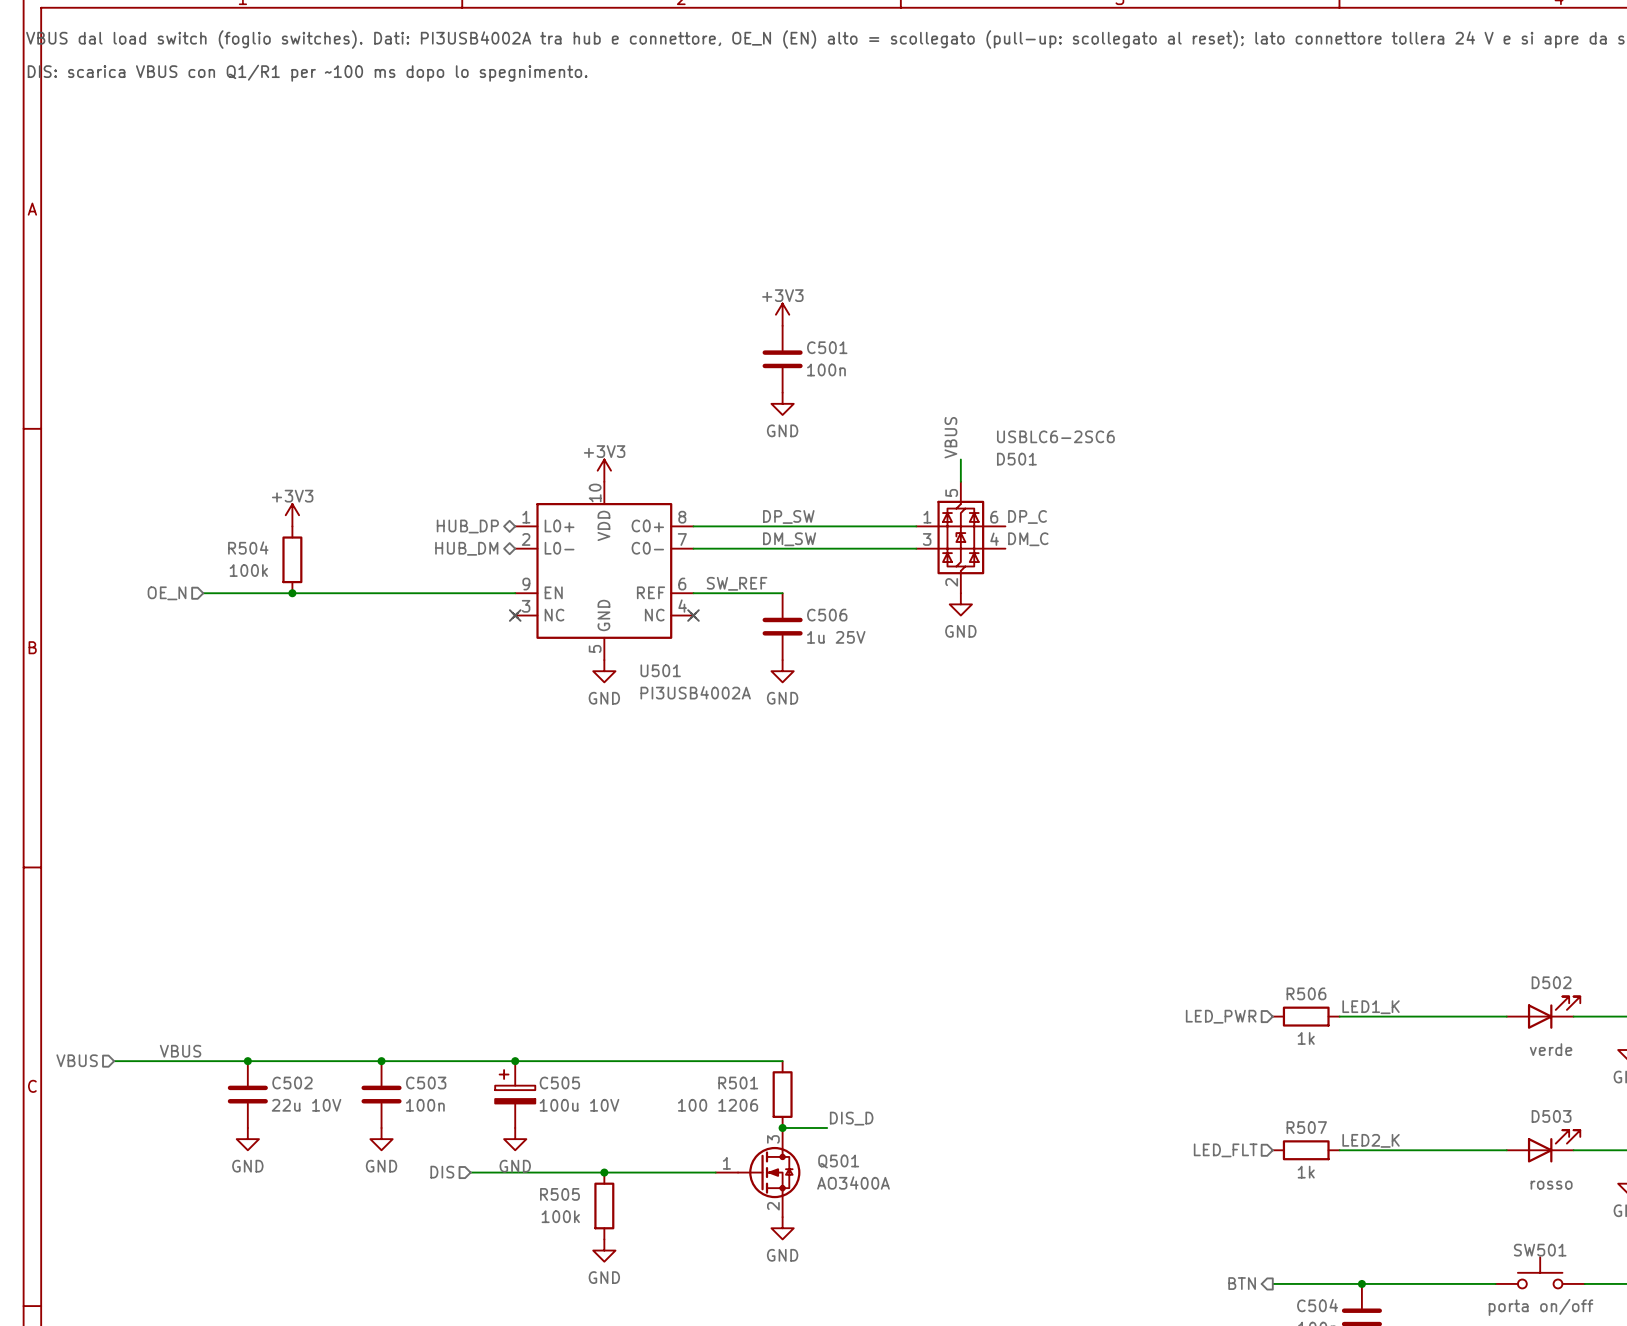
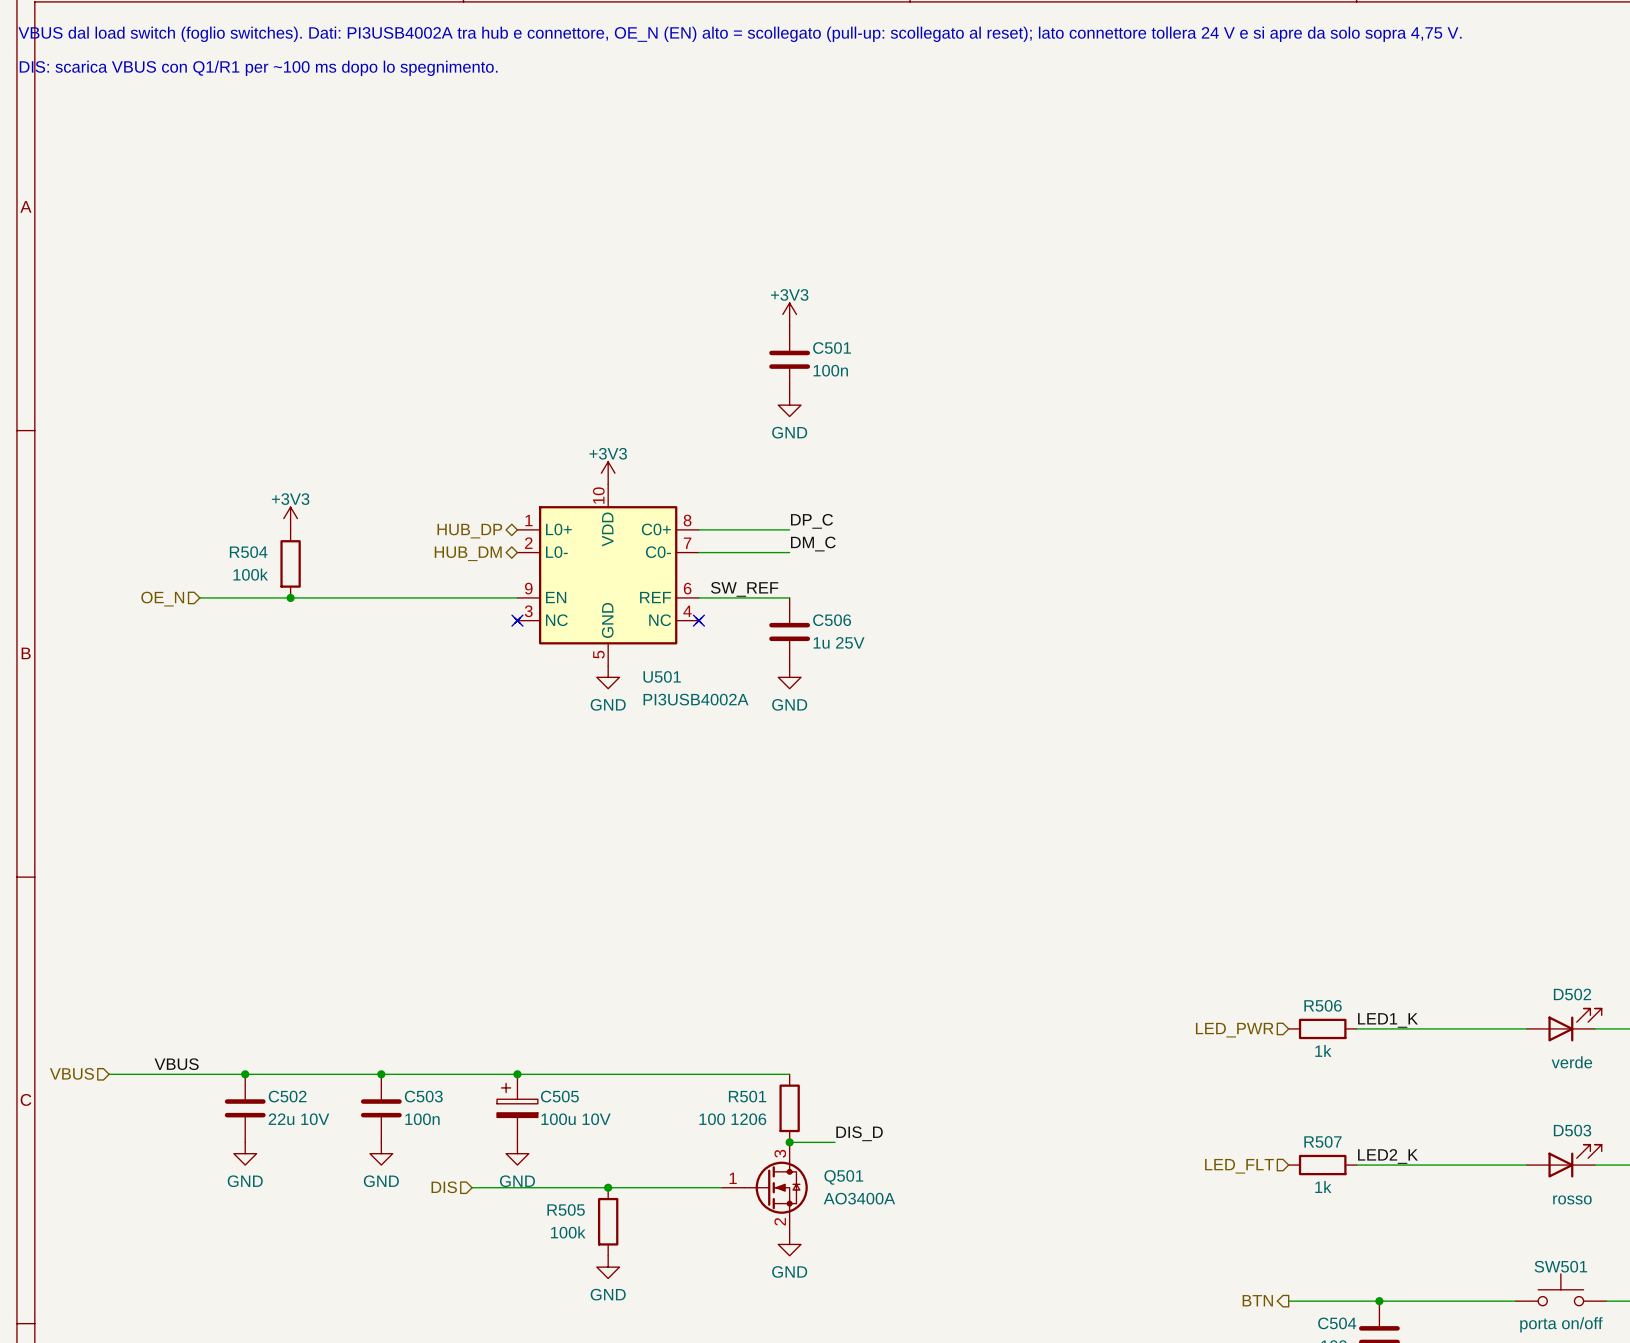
label: VBUS (950, 437) -> none
wire: (960, 459) (960, 481) -> none
label: DP_SW (788, 516) -> DP_C (811, 521)
label: DP_C (1027, 516) -> none
wire: (782, 526) (916, 526) -> none
D501: USBLC6-2SC6 (960, 537) -> none
label: DM_SW (789, 539) -> DM_C (813, 544)
label: DM_C (1028, 539) -> none
wire: (782, 548) (916, 548) -> none
power symbol: GND (960, 604) -> none

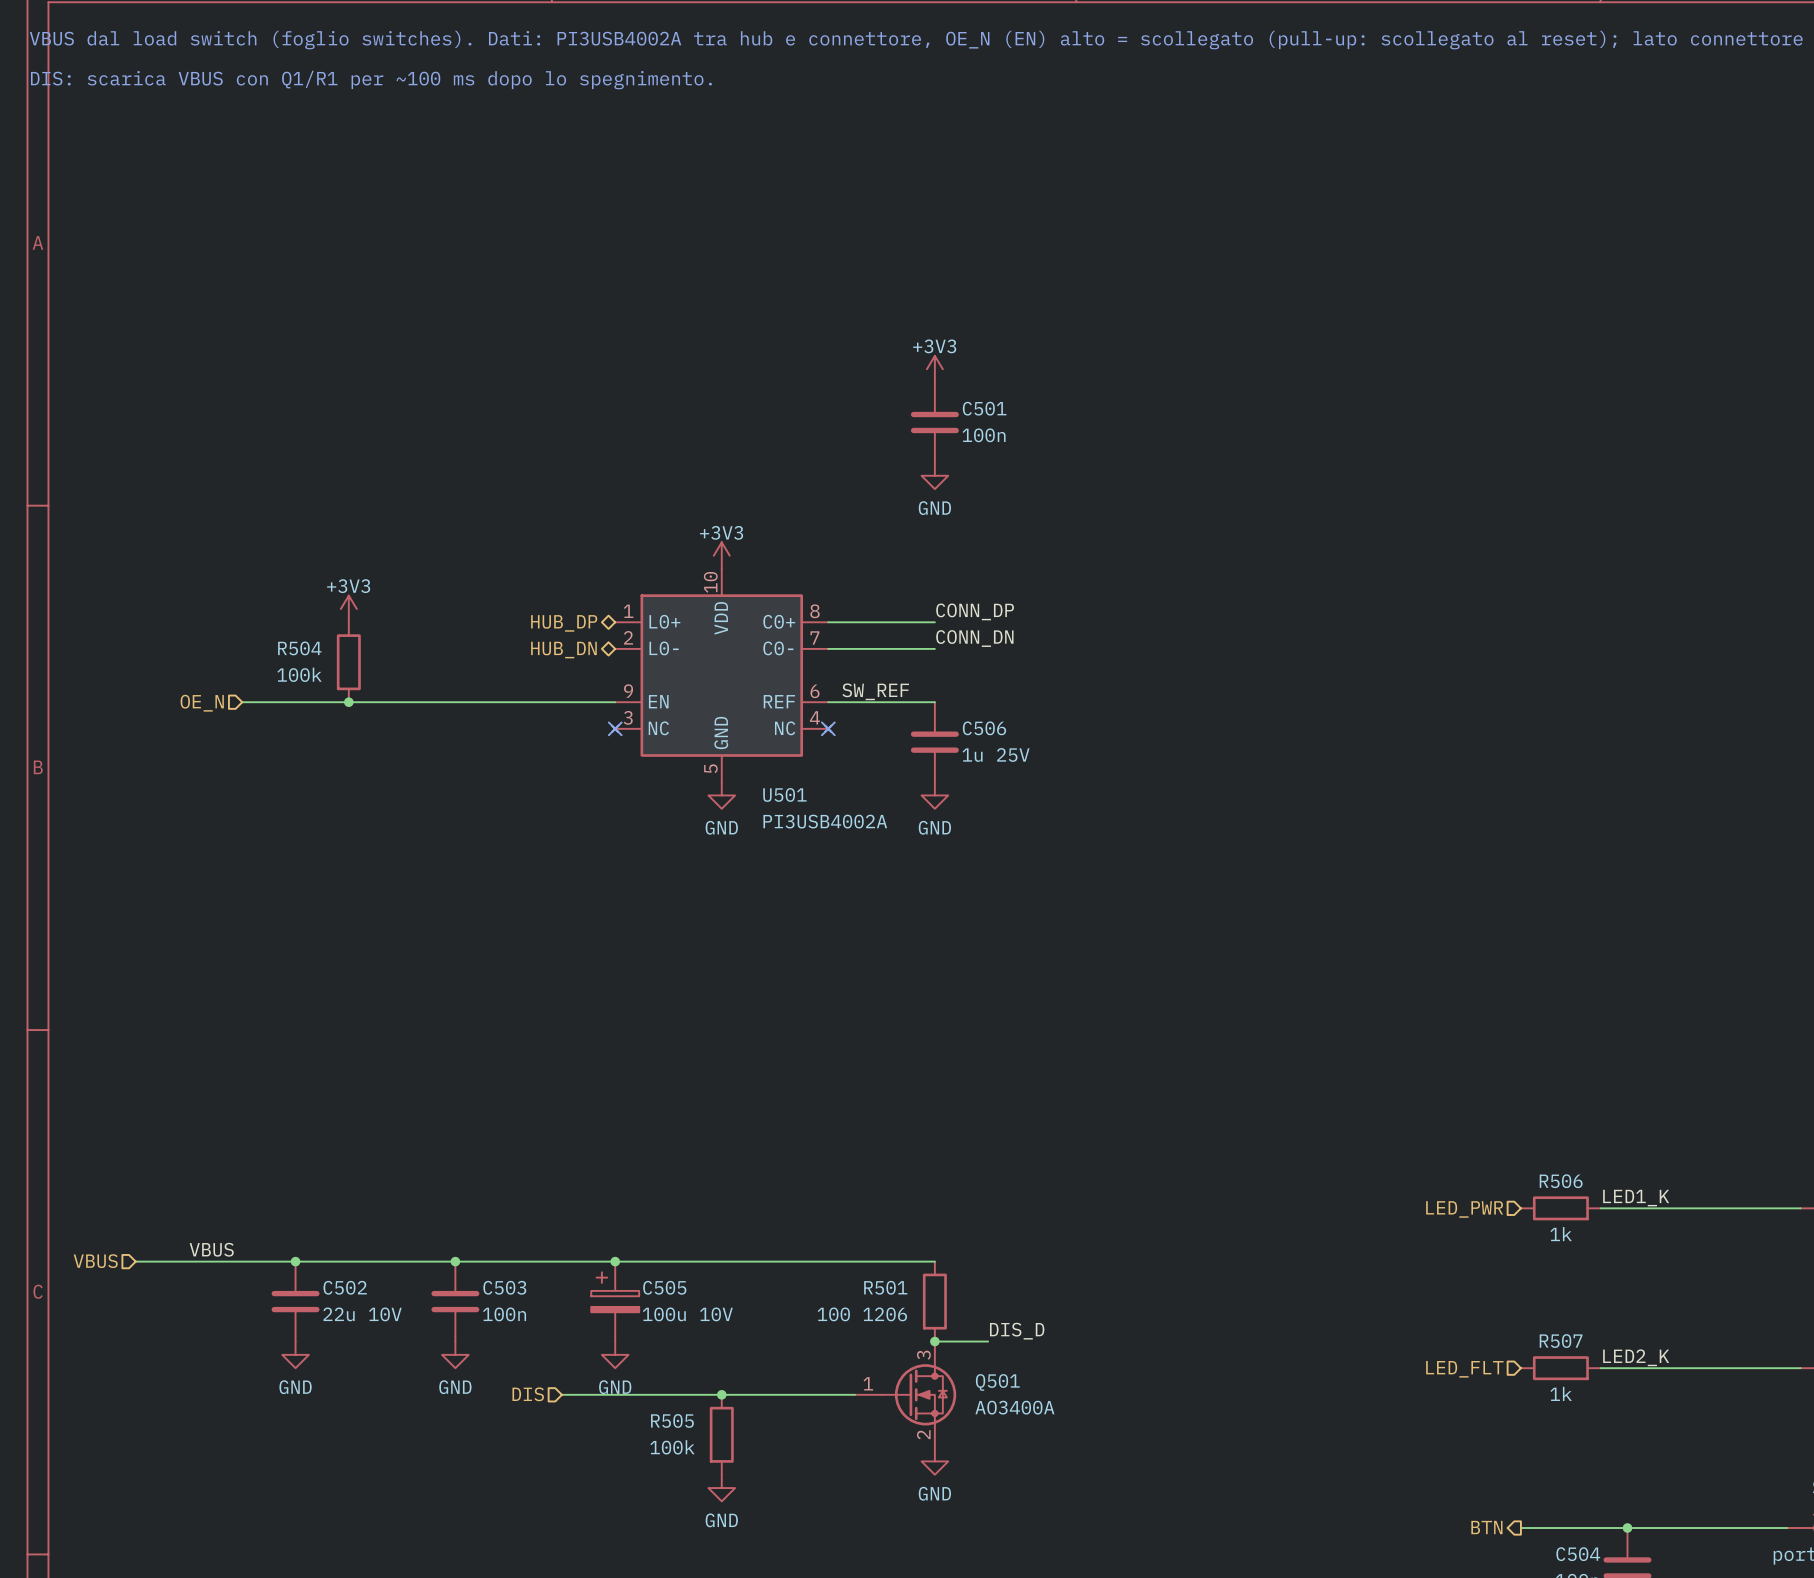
label: DP_C (811, 521) -> CONN_DP (975, 611)
label: DM_C (813, 544) -> CONN_DN (974, 638)
hierarchical label: HUB_DM (468, 553) -> HUB_DN (563, 650)

